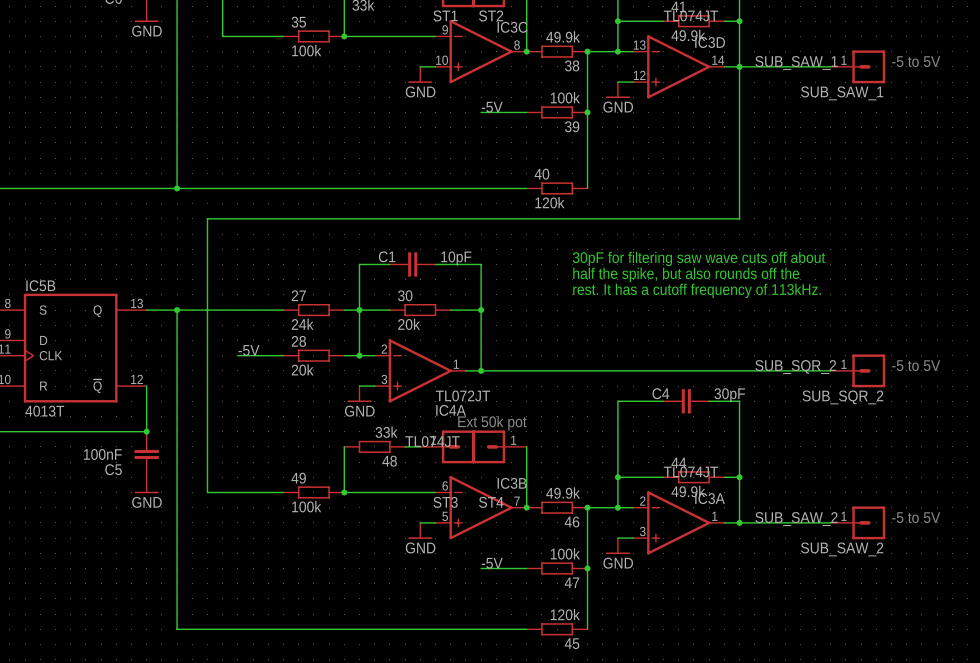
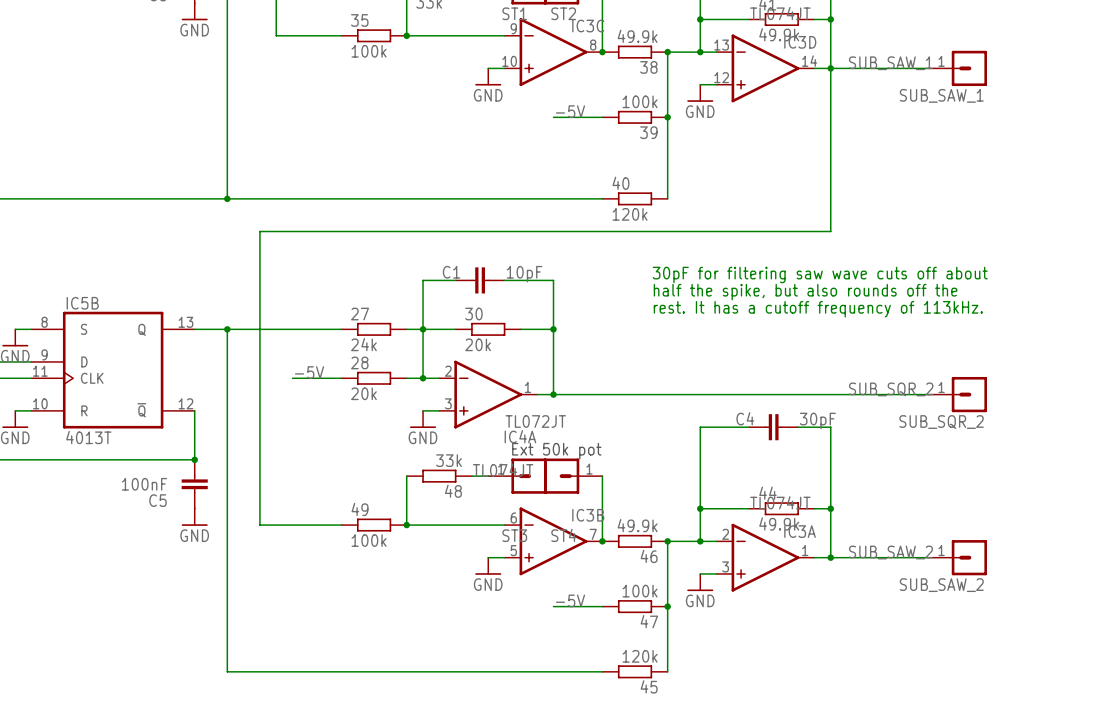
text: -5 to 5V (916, 61) -> none
text: -5 to 5V (916, 365) -> none
text: -5 to 5V (916, 517) -> none

